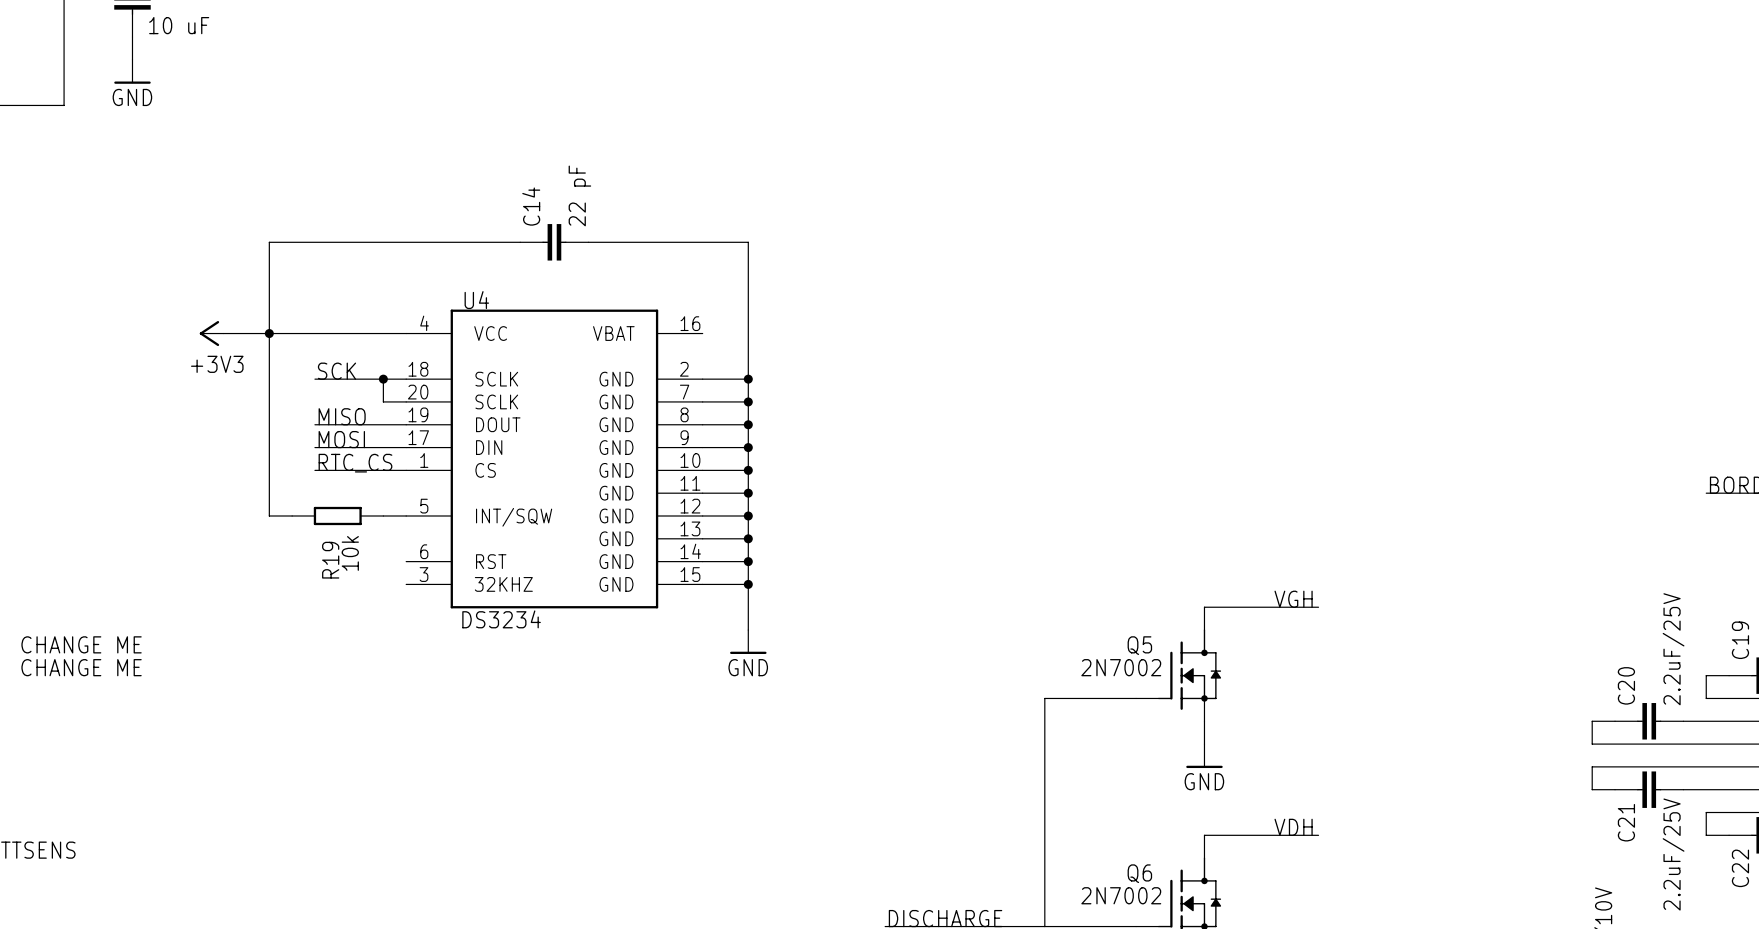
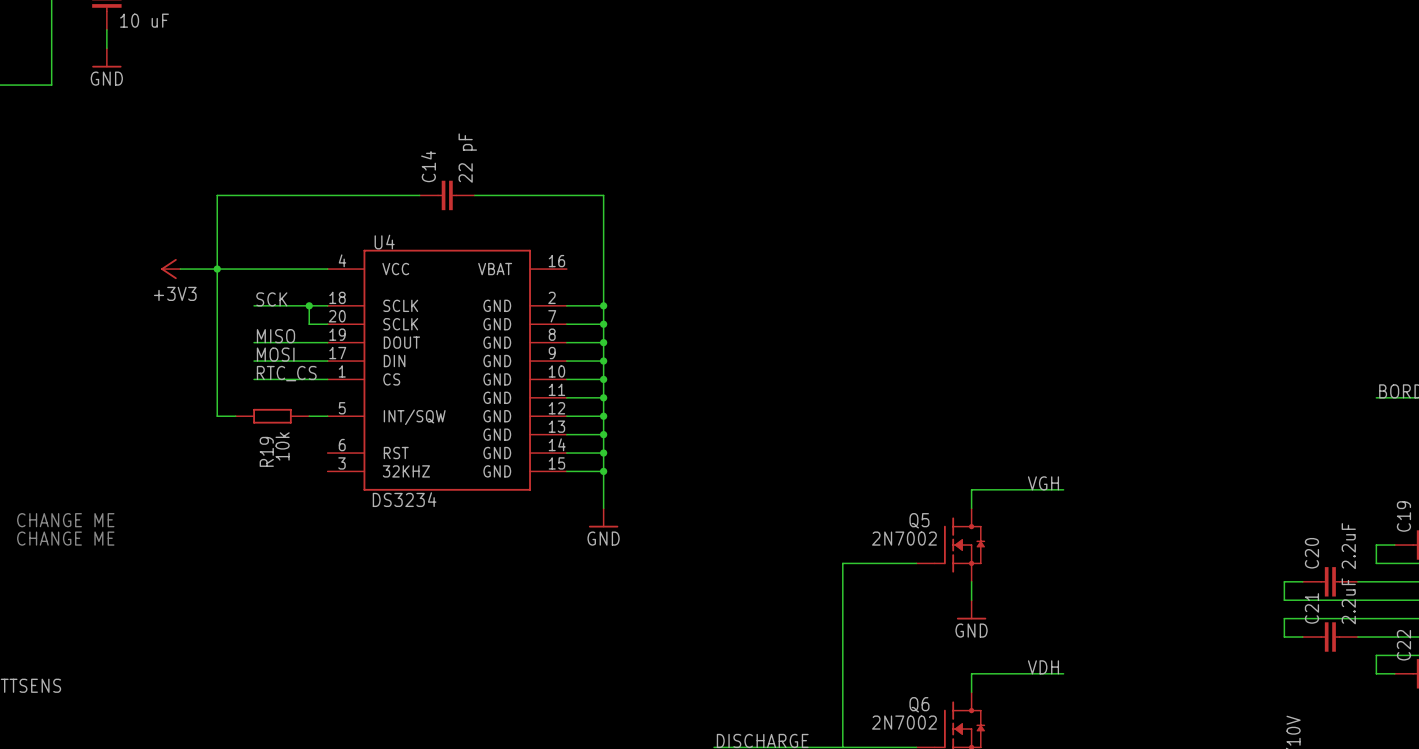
C20 value: 2.2uF/25V (1673, 649) -> 2.2uF (1348, 546)
C21 name position: C21 (1626, 822) -> C21 (1311, 608)
C21 value: 2.2uF/25V (1673, 854) -> 2.2uF (1348, 601)
C22 name position: C22 (1740, 868) -> C22 (1403, 645)

